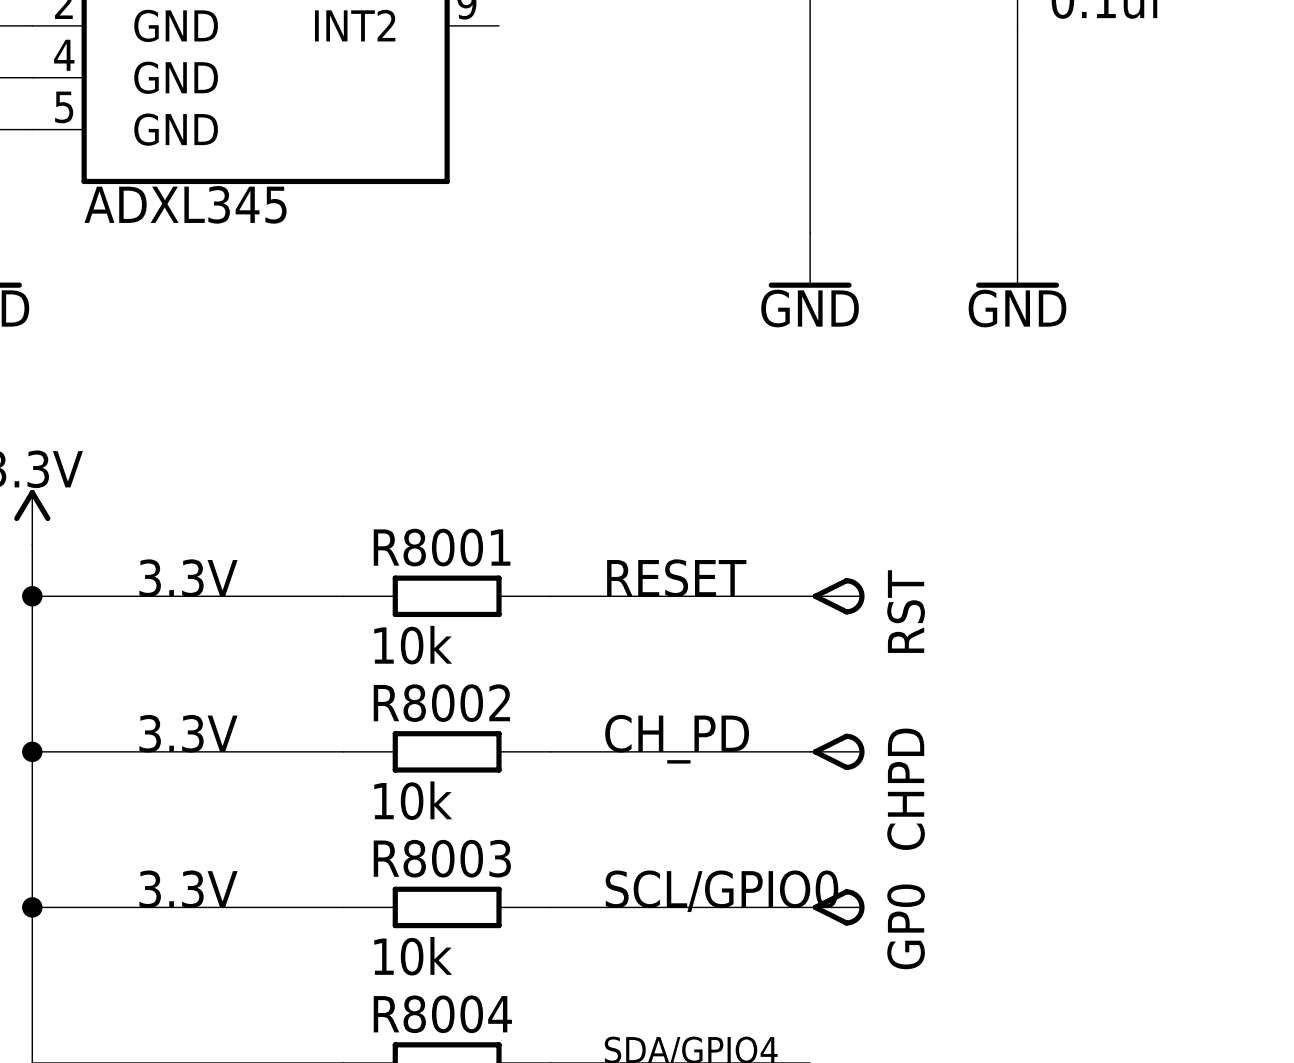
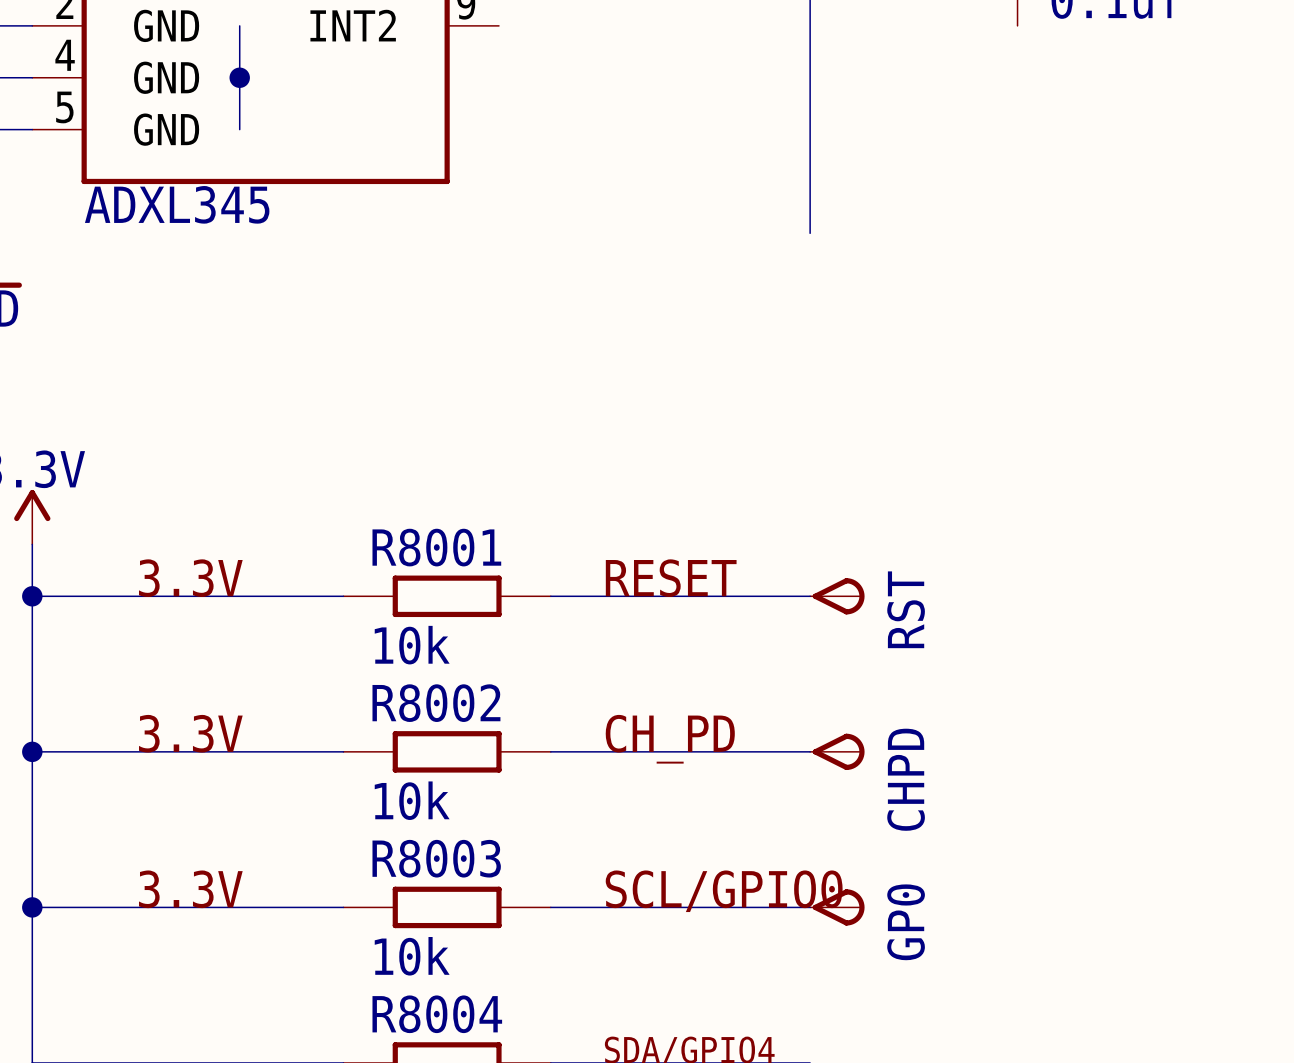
wire: none -> (239, 25) (239, 129)
wire: (1017, 25) (1017, 233) -> none
junction: none -> (239, 77)
power symbol: GND (810, 260) -> none
power symbol: GND (1017, 260) -> none

